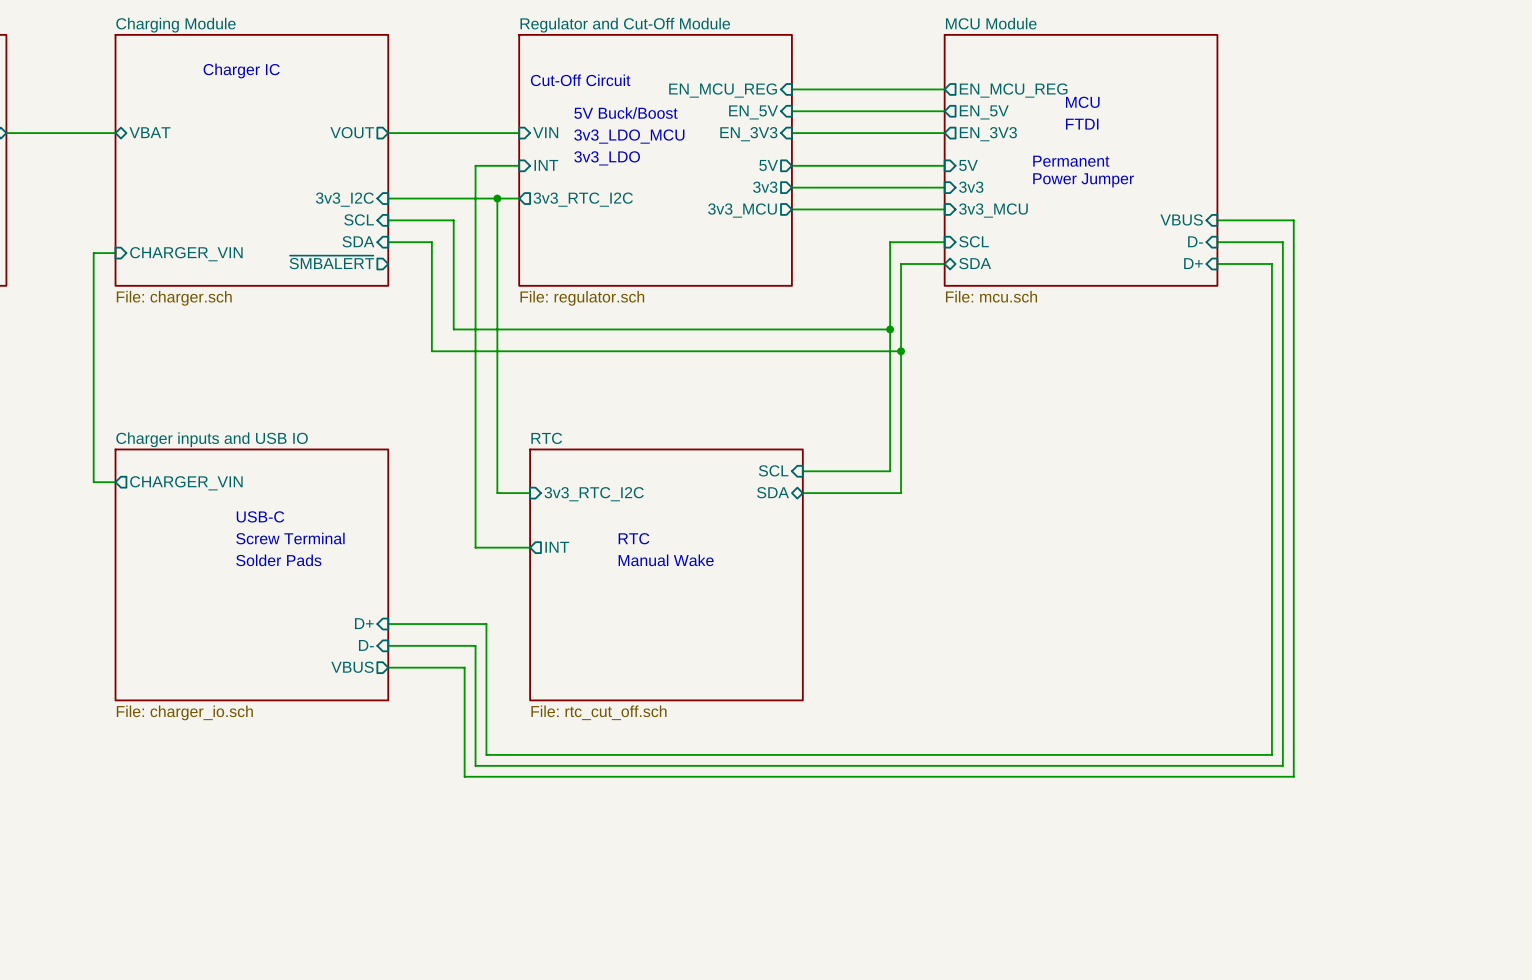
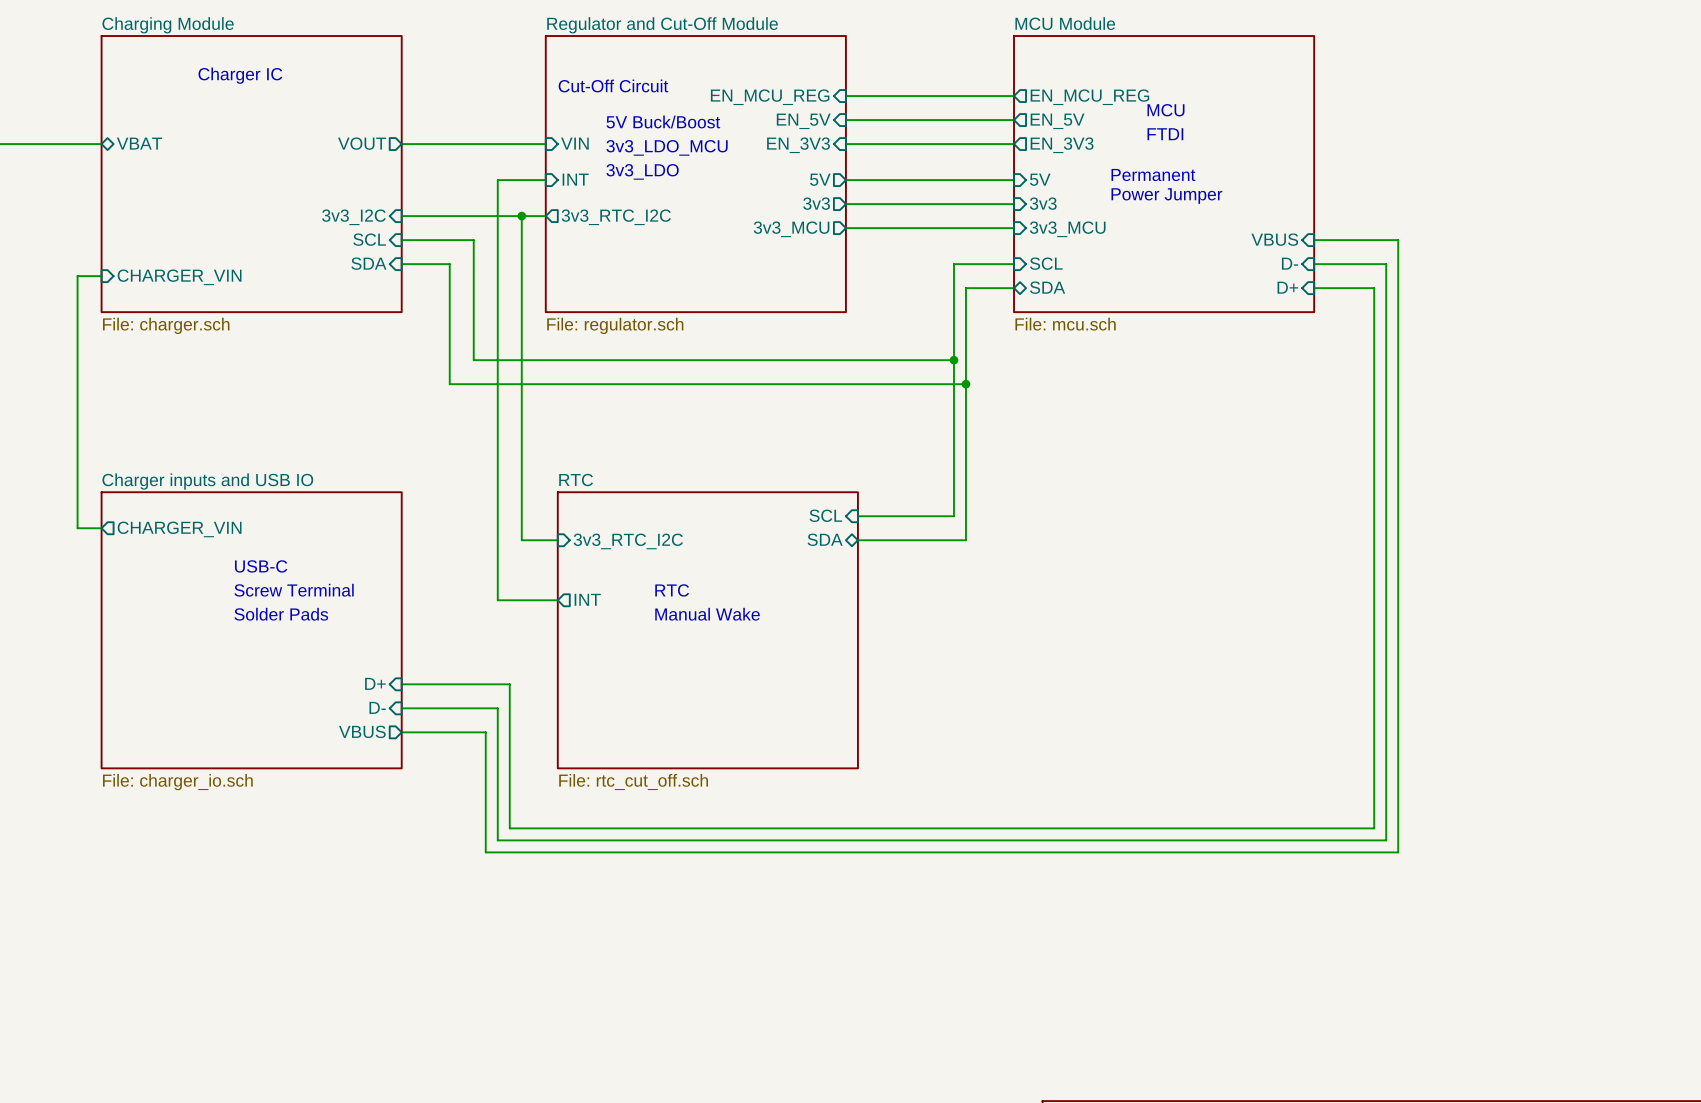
sheet pin: ~{SMBALERT} (331, 262) -> none

